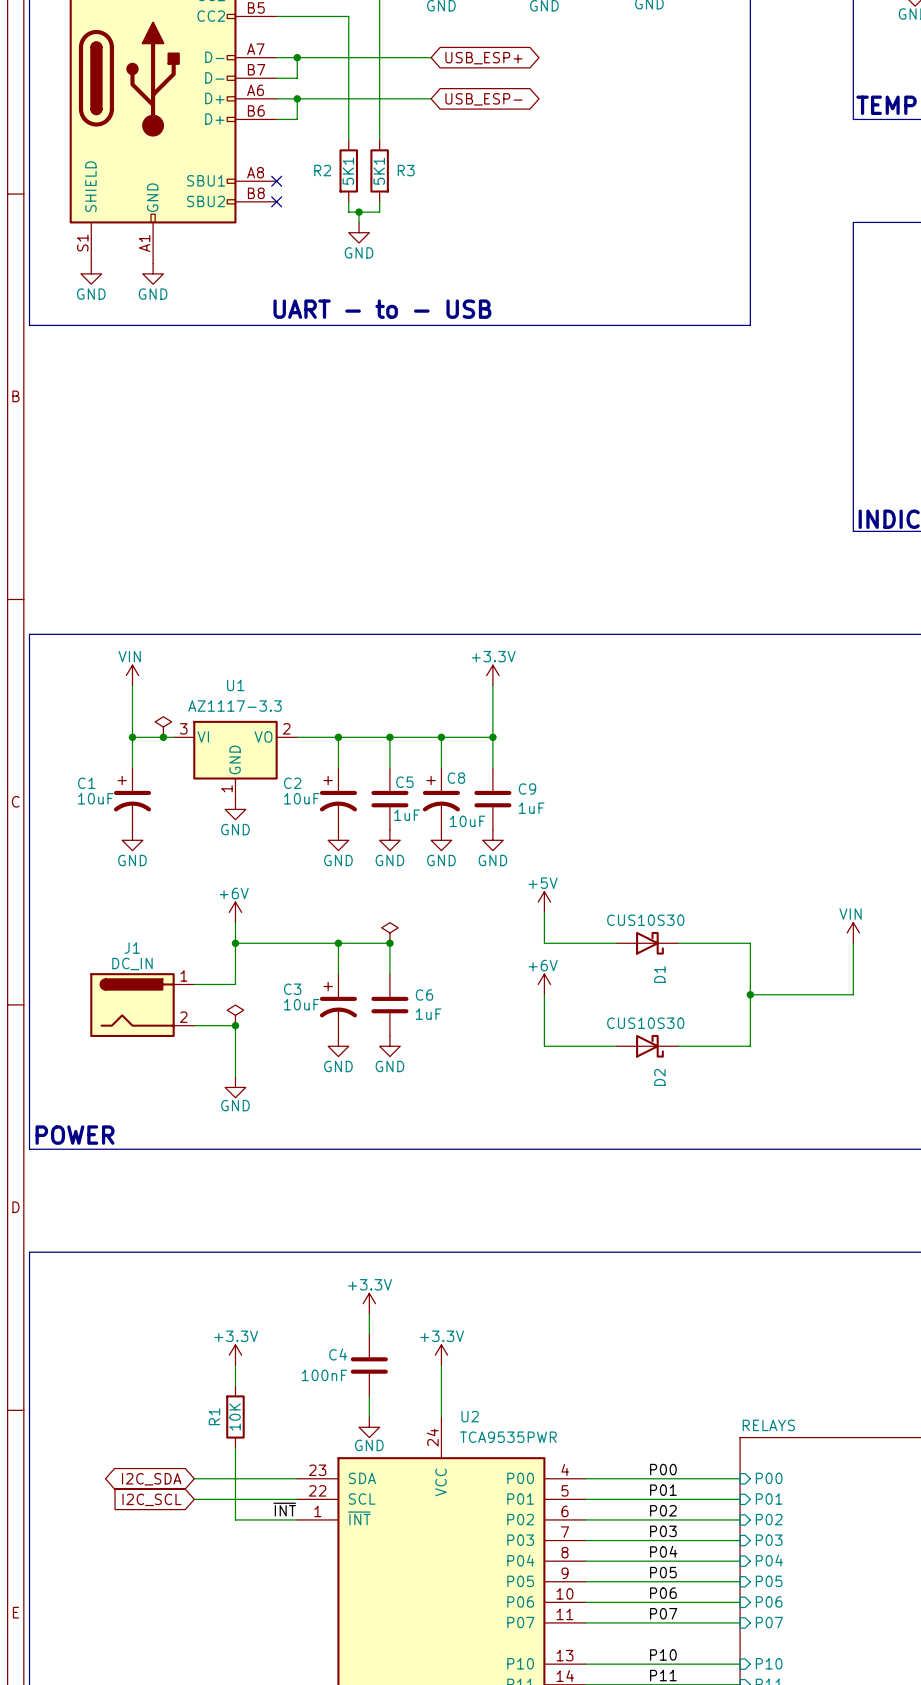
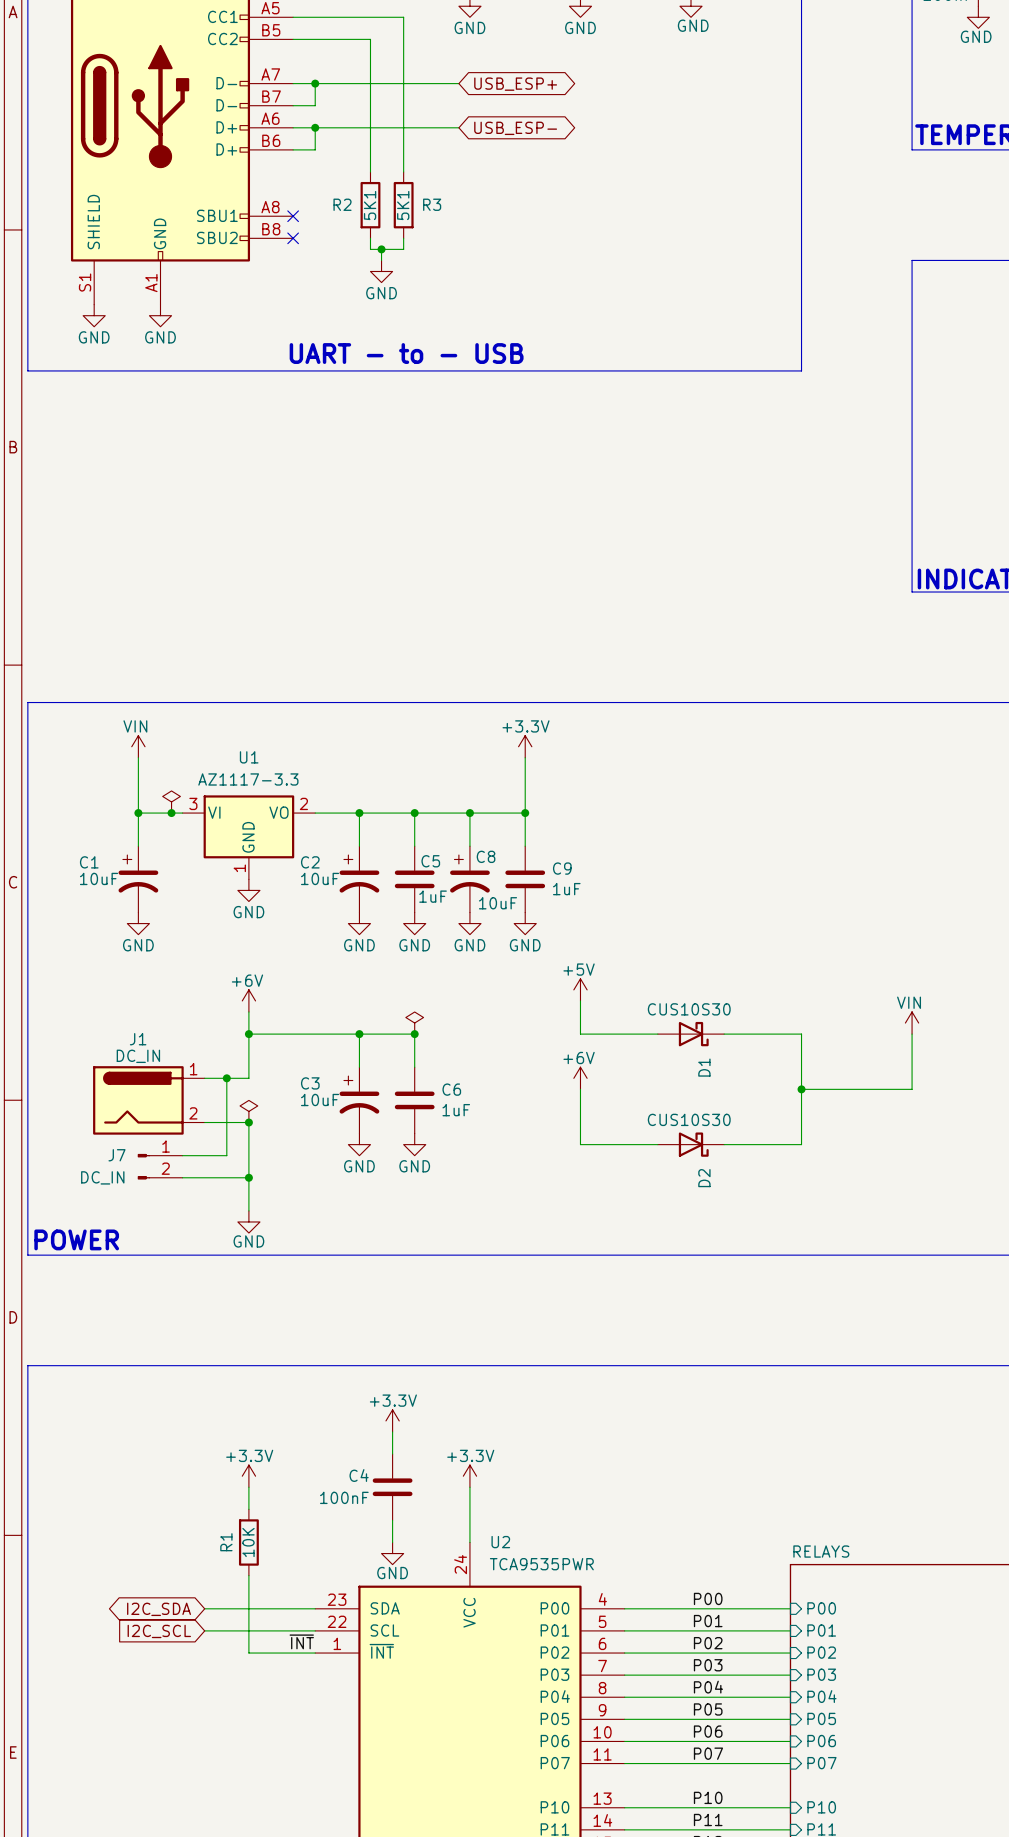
wire: none -> (226, 1078) (226, 1155) (182, 1155)
junction: none -> (226, 1078)
J7: none -> DC_IN (160, 1166)
wire: none -> (182, 1177) (248, 1177) (248, 1210)
junction: none -> (248, 1177)
power symbol position: GND (235, 1087) -> GND (248, 1221)

